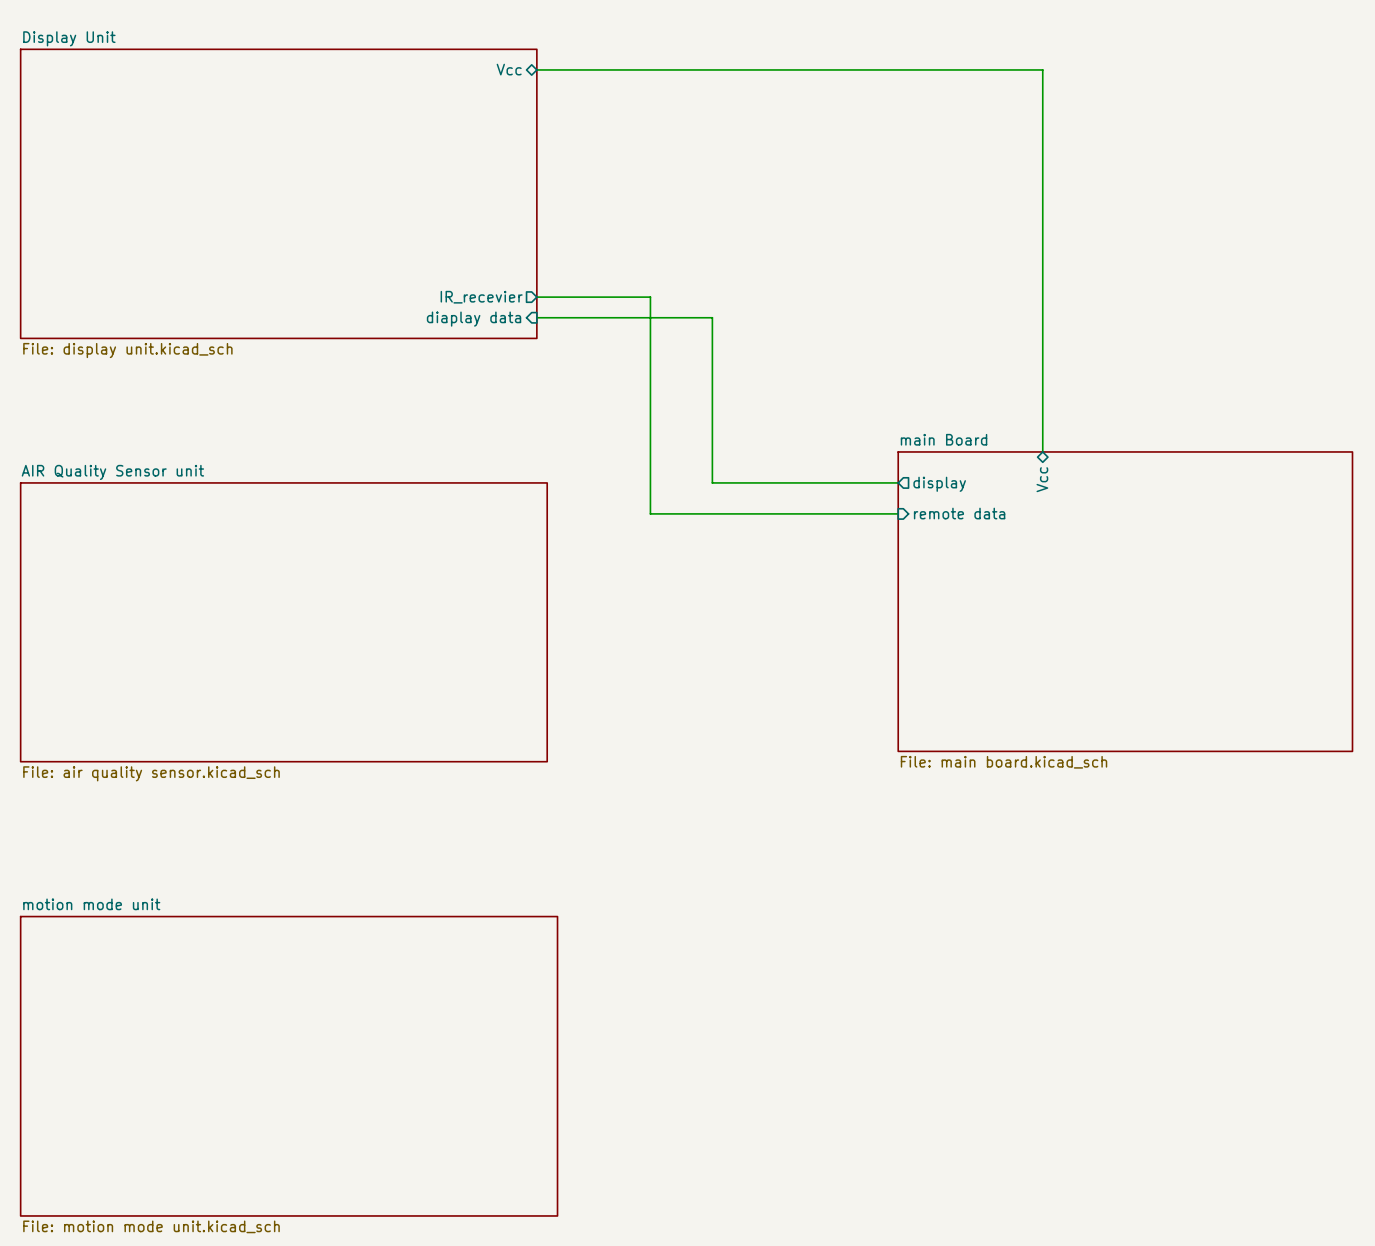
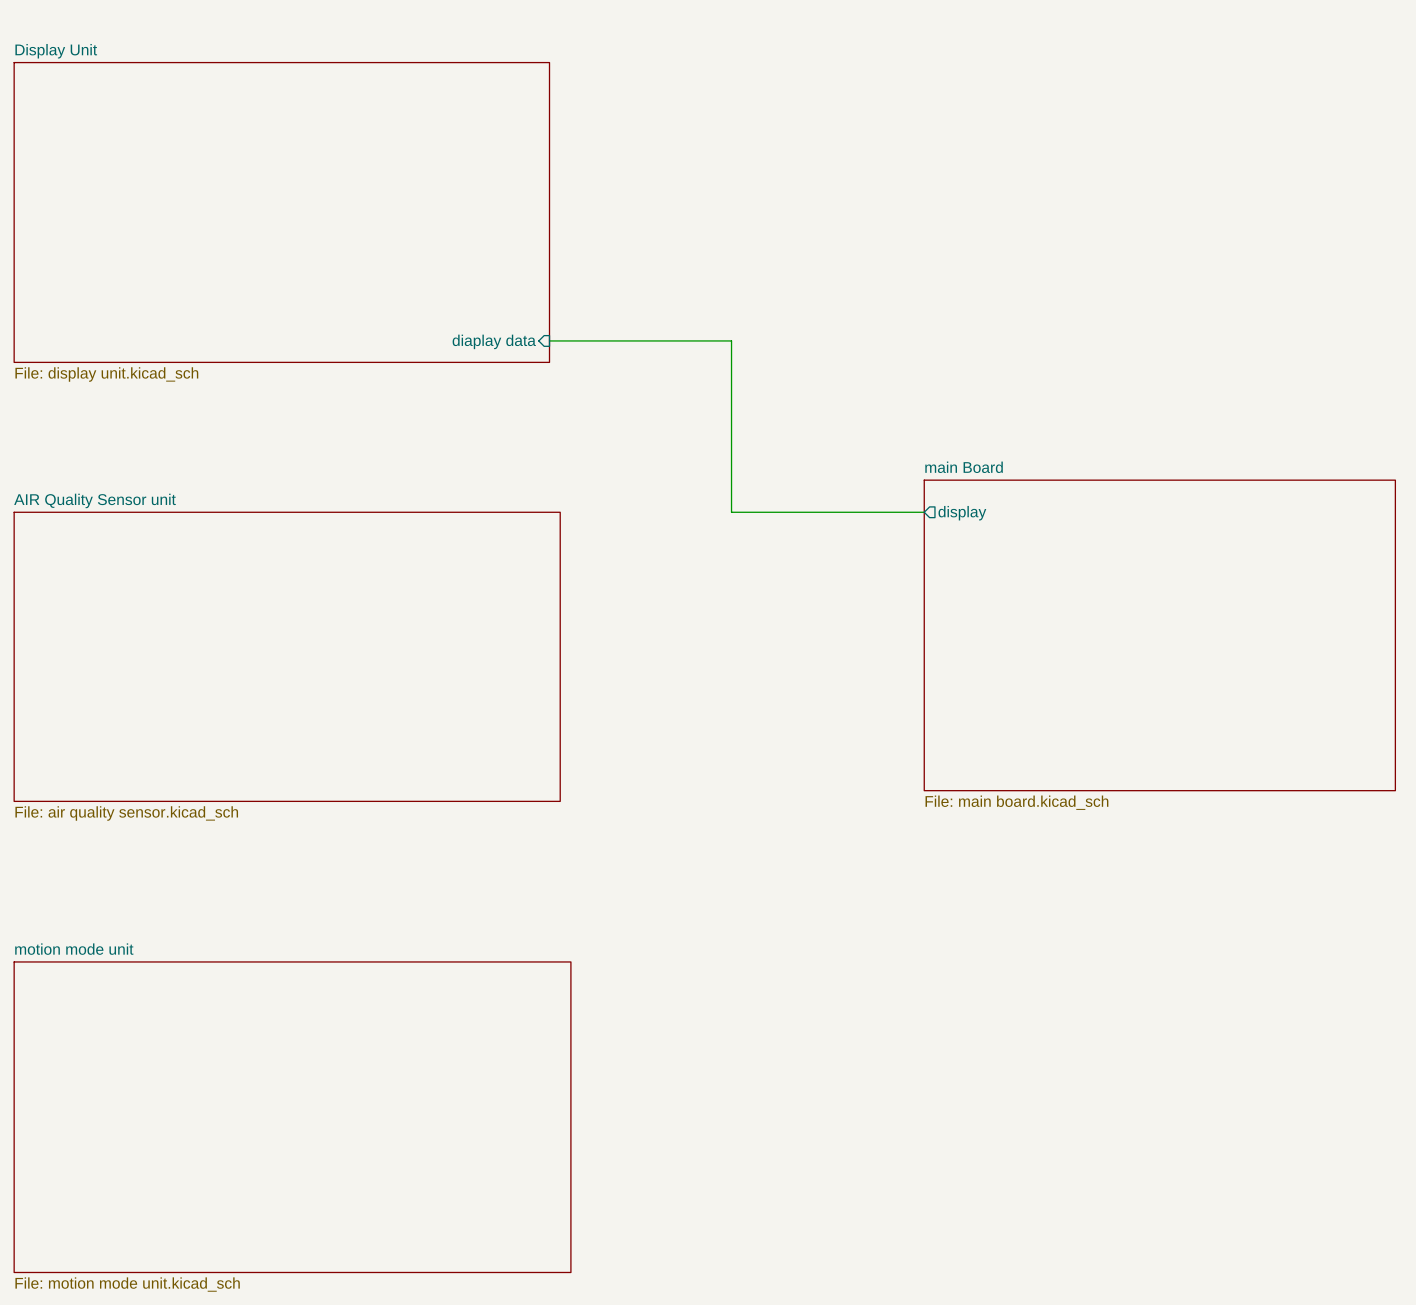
sheet pin: Vcc (509, 69) -> none
wire: (536, 69) (1042, 69) (1042, 451) -> none
sheet pin: IR_recevier (481, 297) -> none
wire: (536, 297) (650, 297) (650, 513) (898, 513) -> none
sheet pin: Vcc (1042, 479) -> none
sheet pin: remote data (959, 513) -> none

